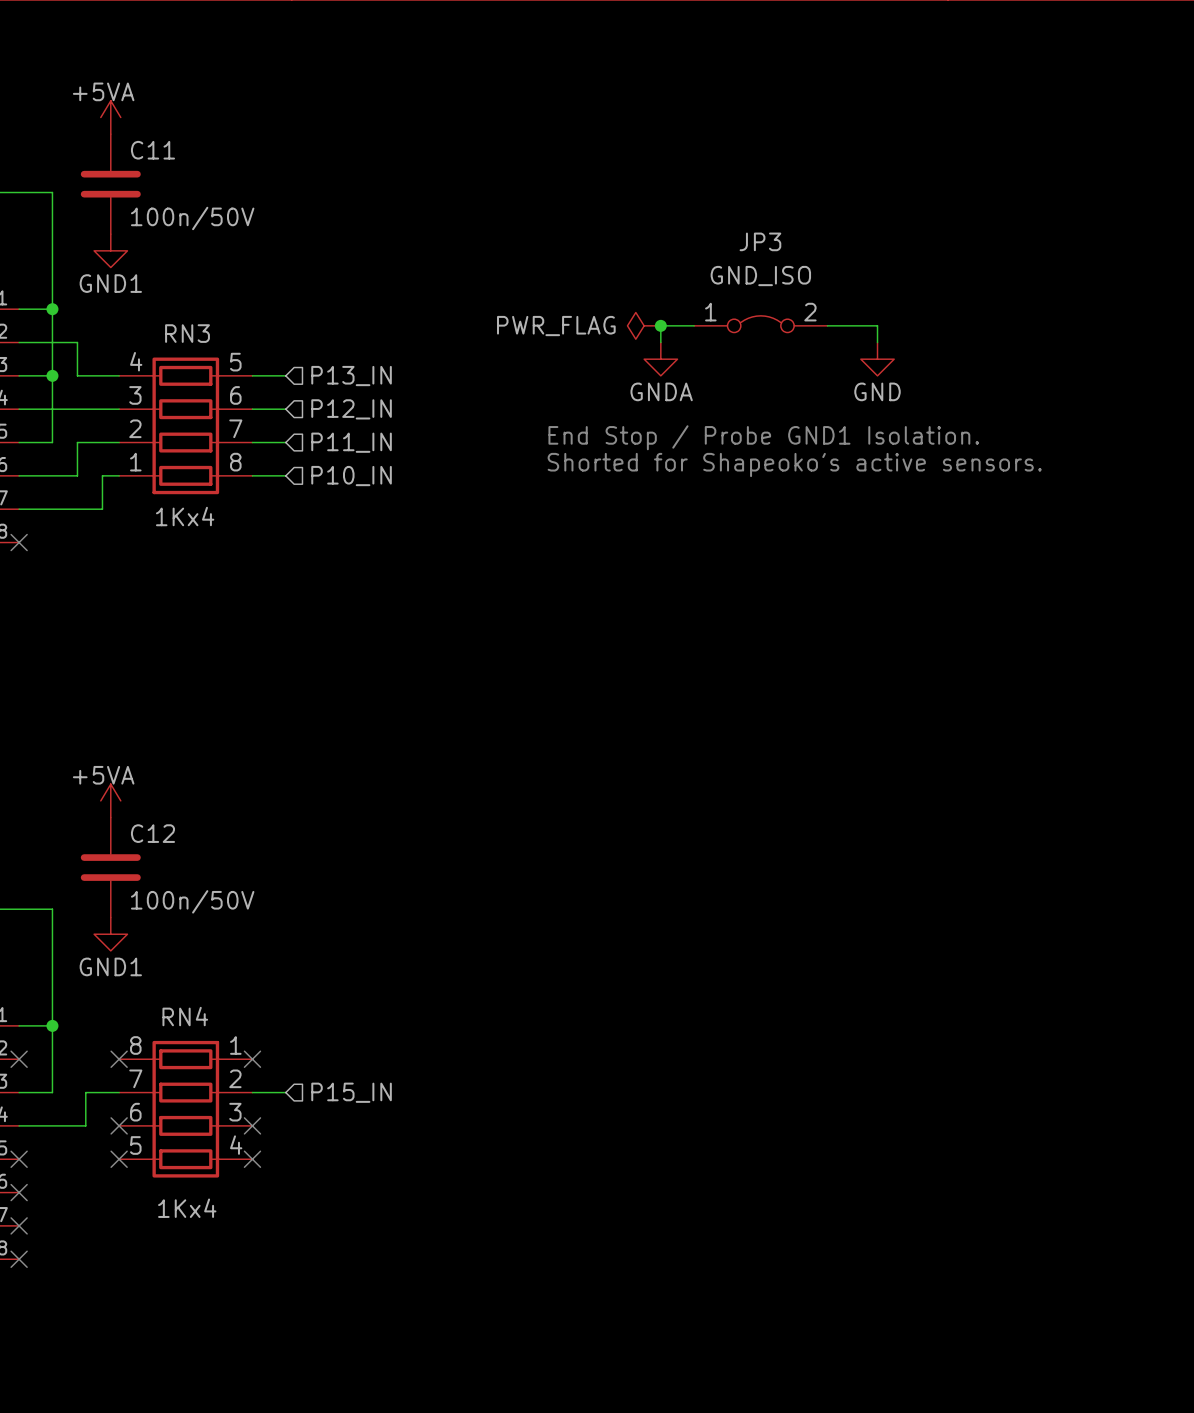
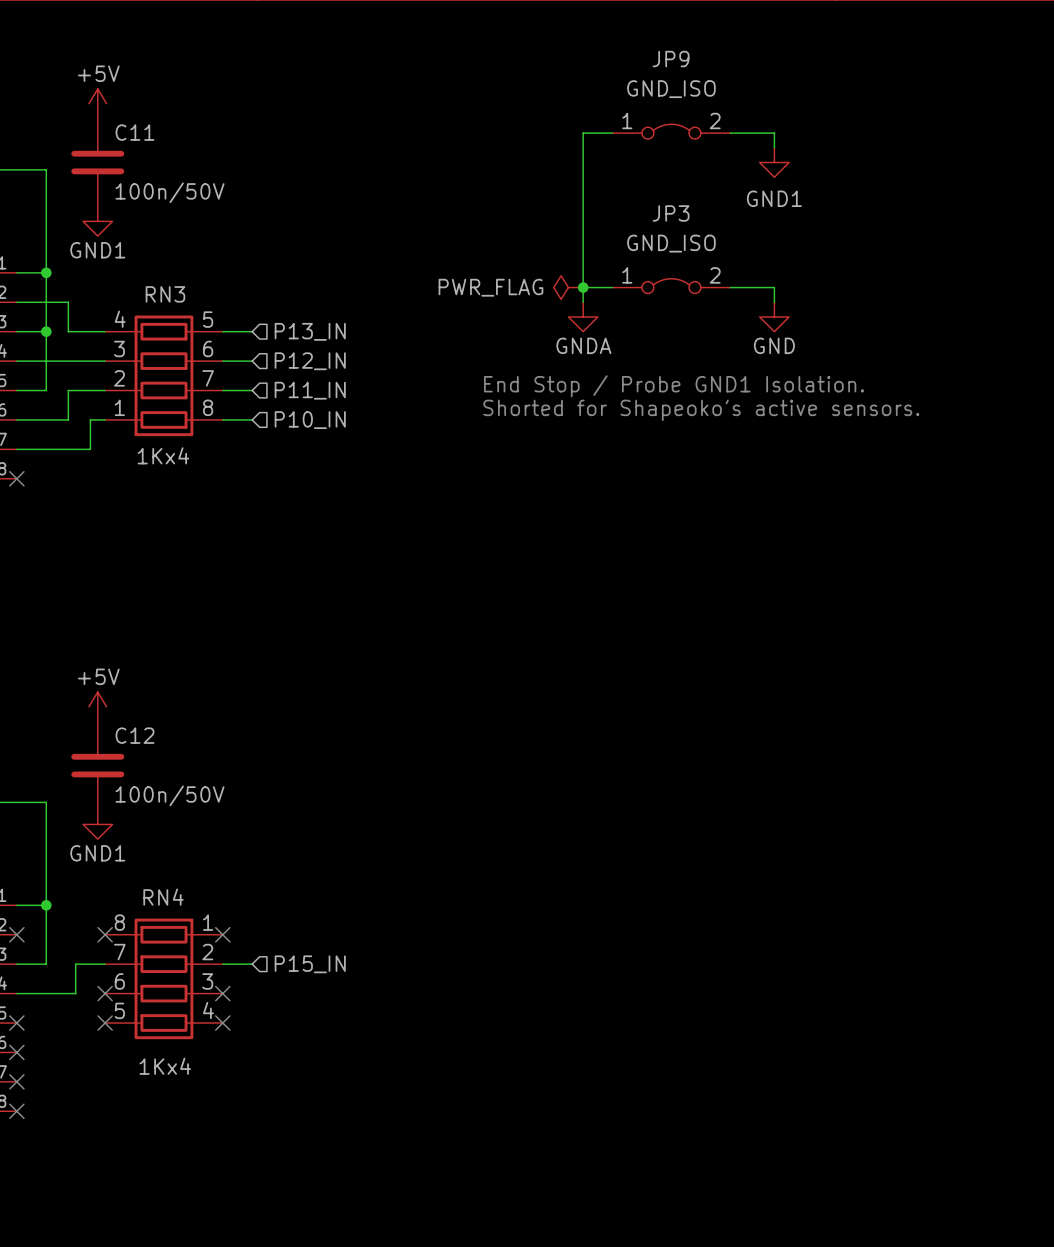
power symbol: +5VA (110, 117) -> +5V (97, 103)
JP9: none -> GND_ISO (671, 131)
wire: none -> (612, 133) (583, 133) (583, 287)
wire: none -> (730, 133) (774, 133) (774, 147)
power symbol: none -> GND1 (774, 162)
power symbol: +5VA (110, 800) -> +5V (97, 706)

